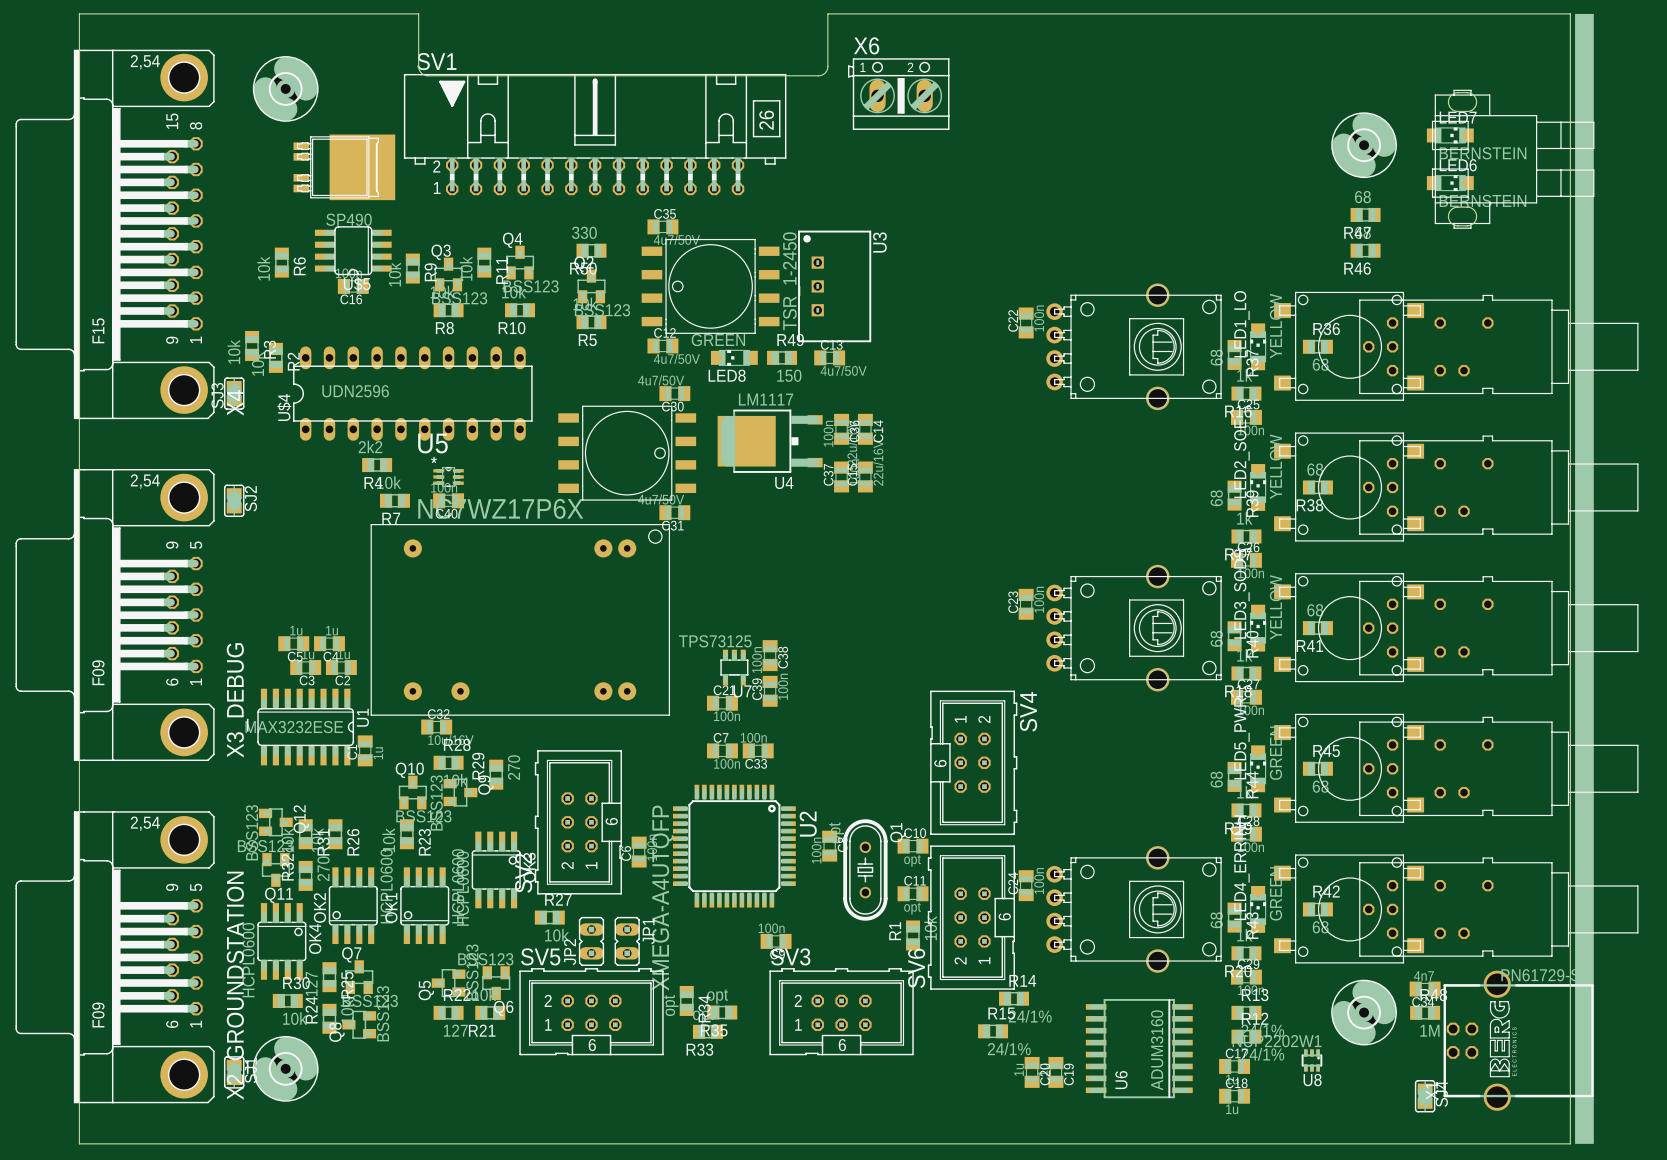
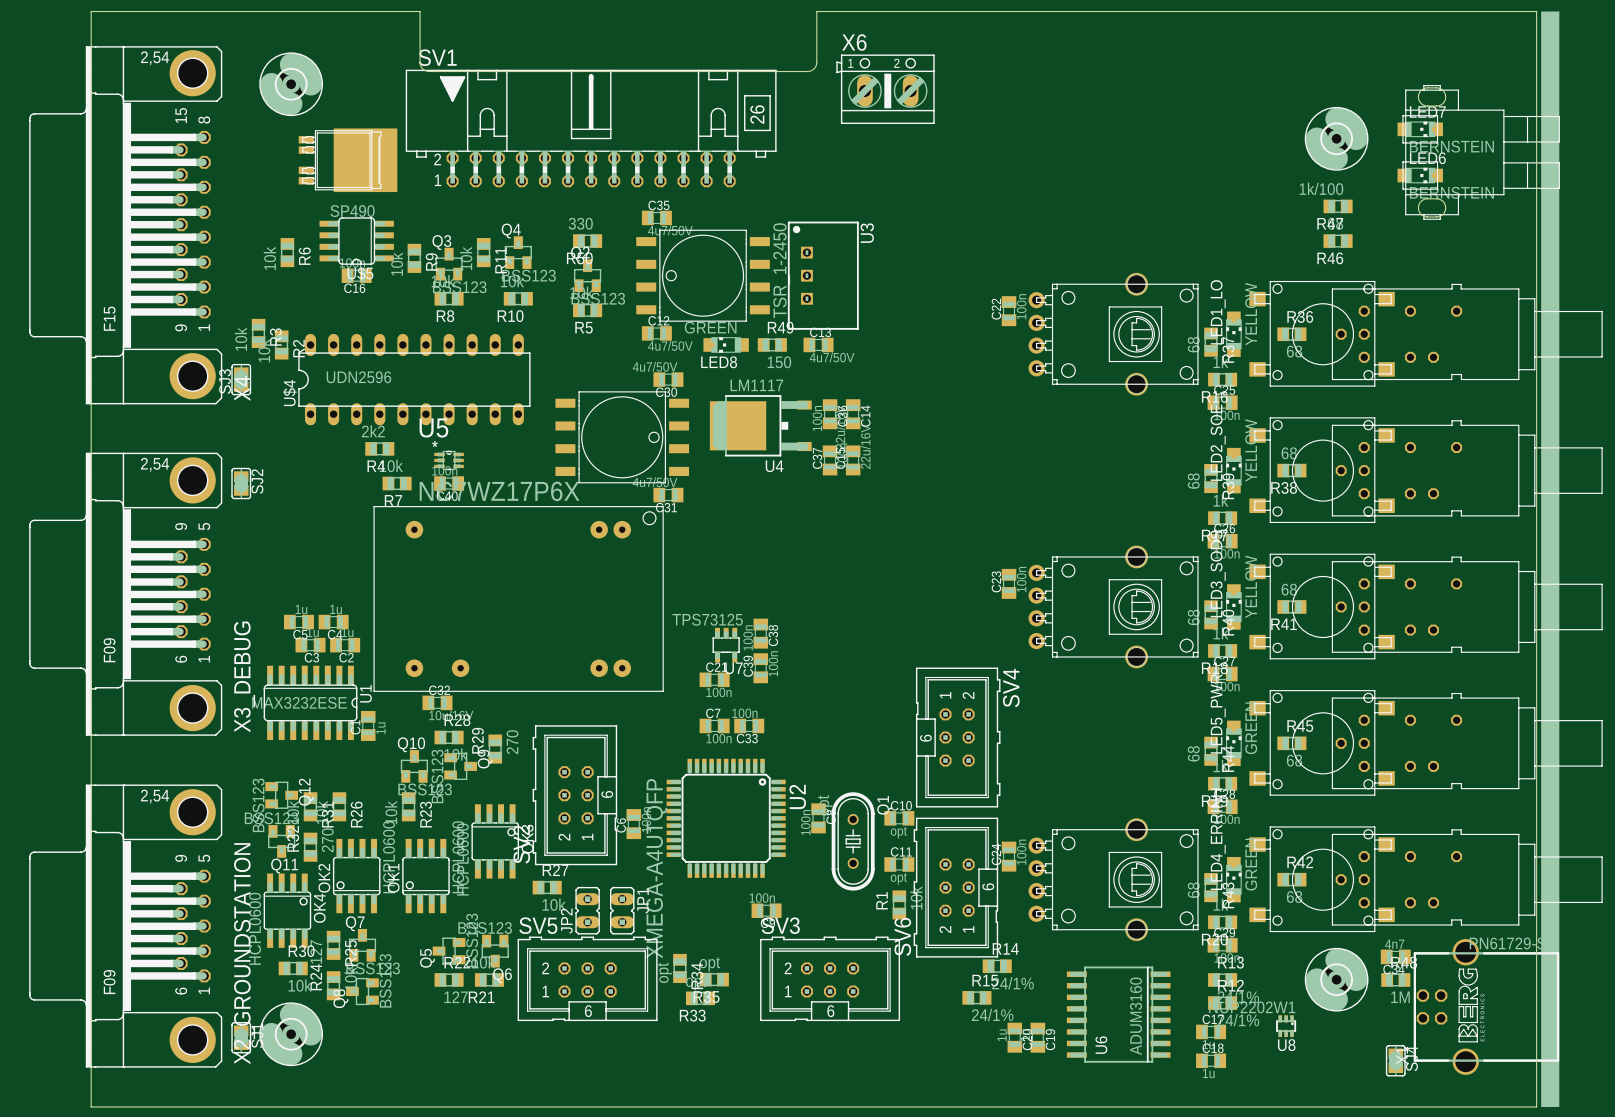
R47 value: 68 (1362, 197) -> 1k/100 (1321, 188)

